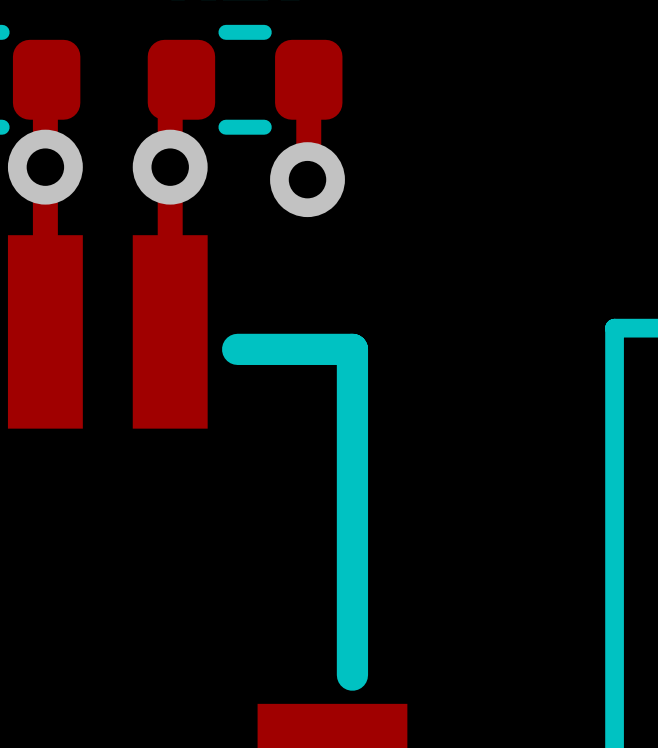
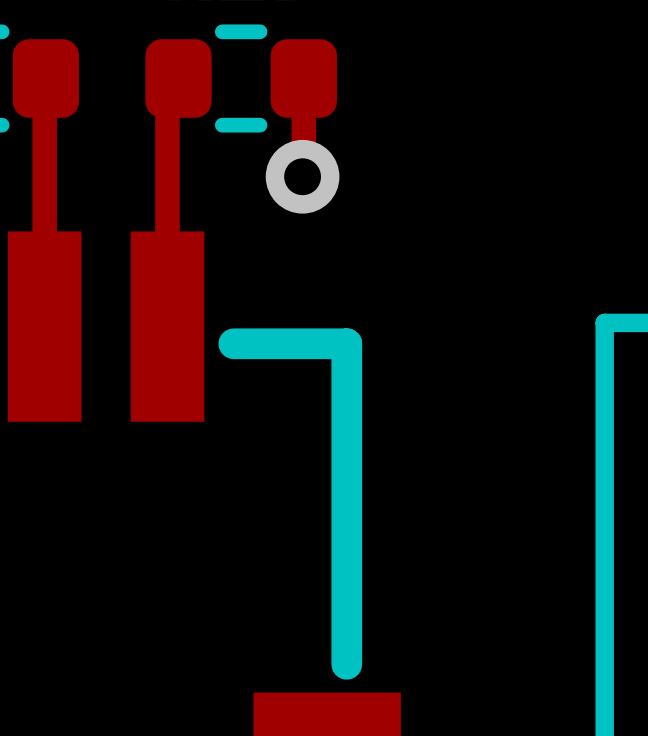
via: (45, 167) -> none
via: (170, 167) -> none

